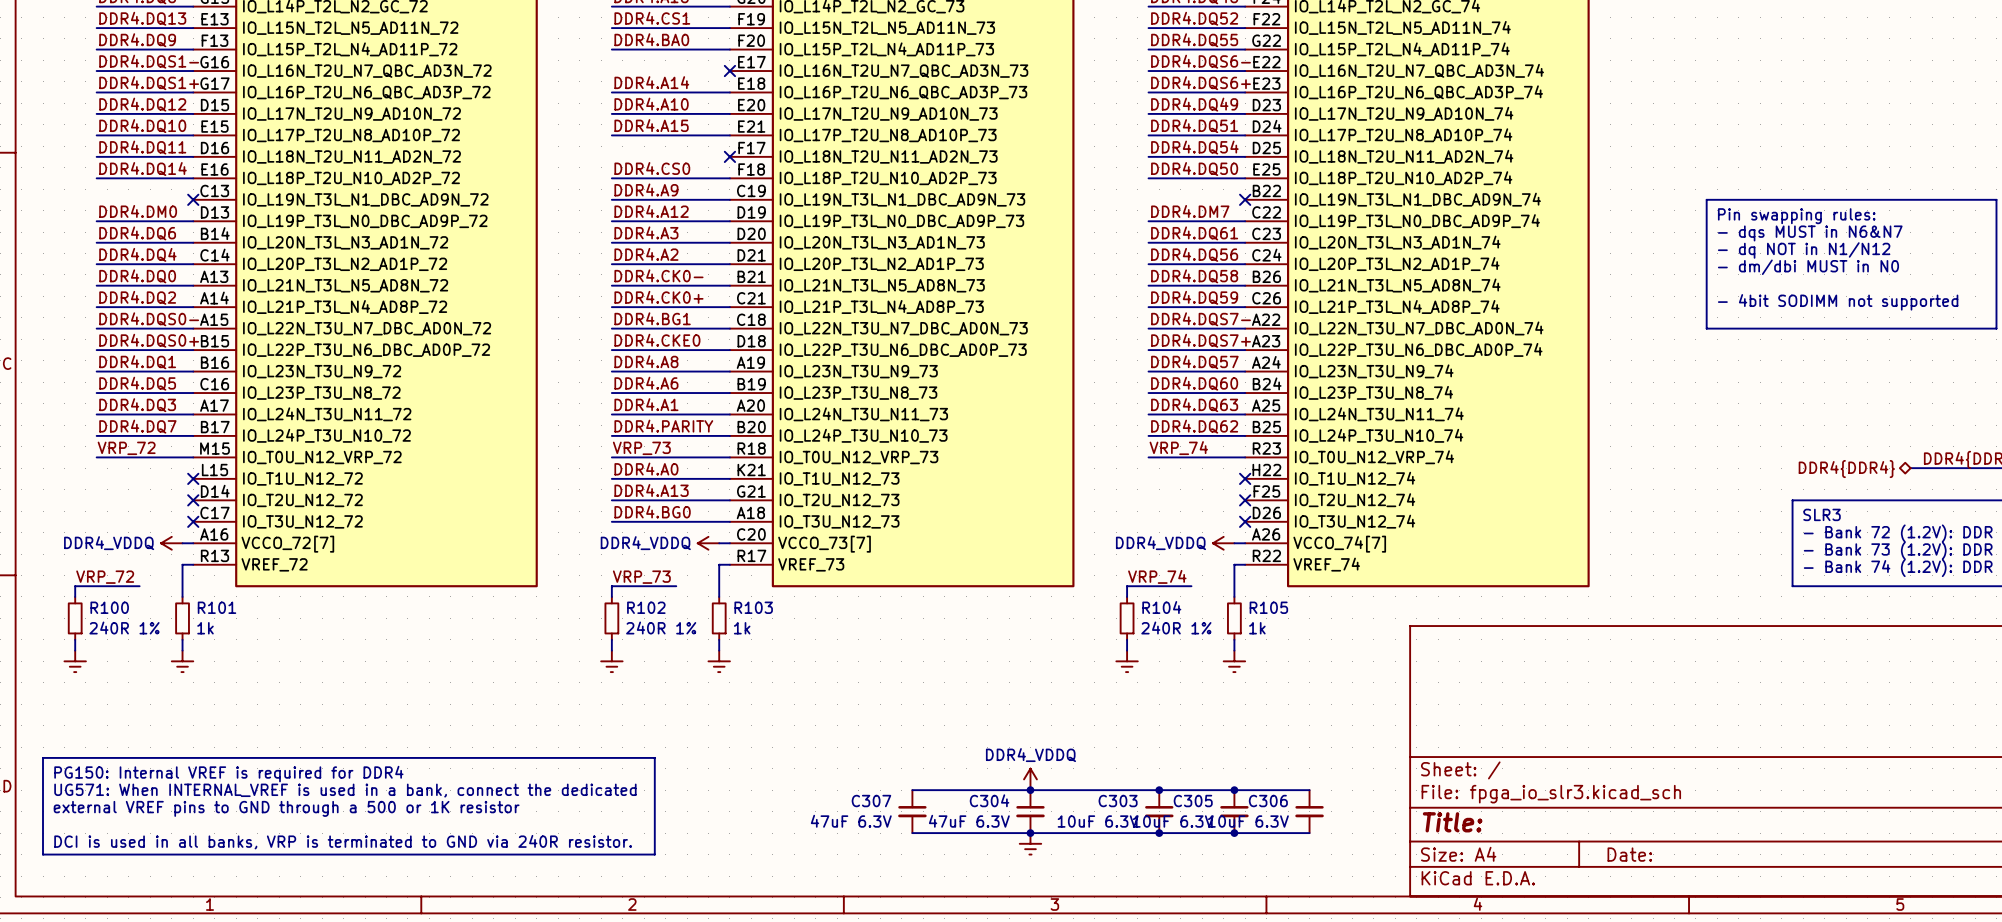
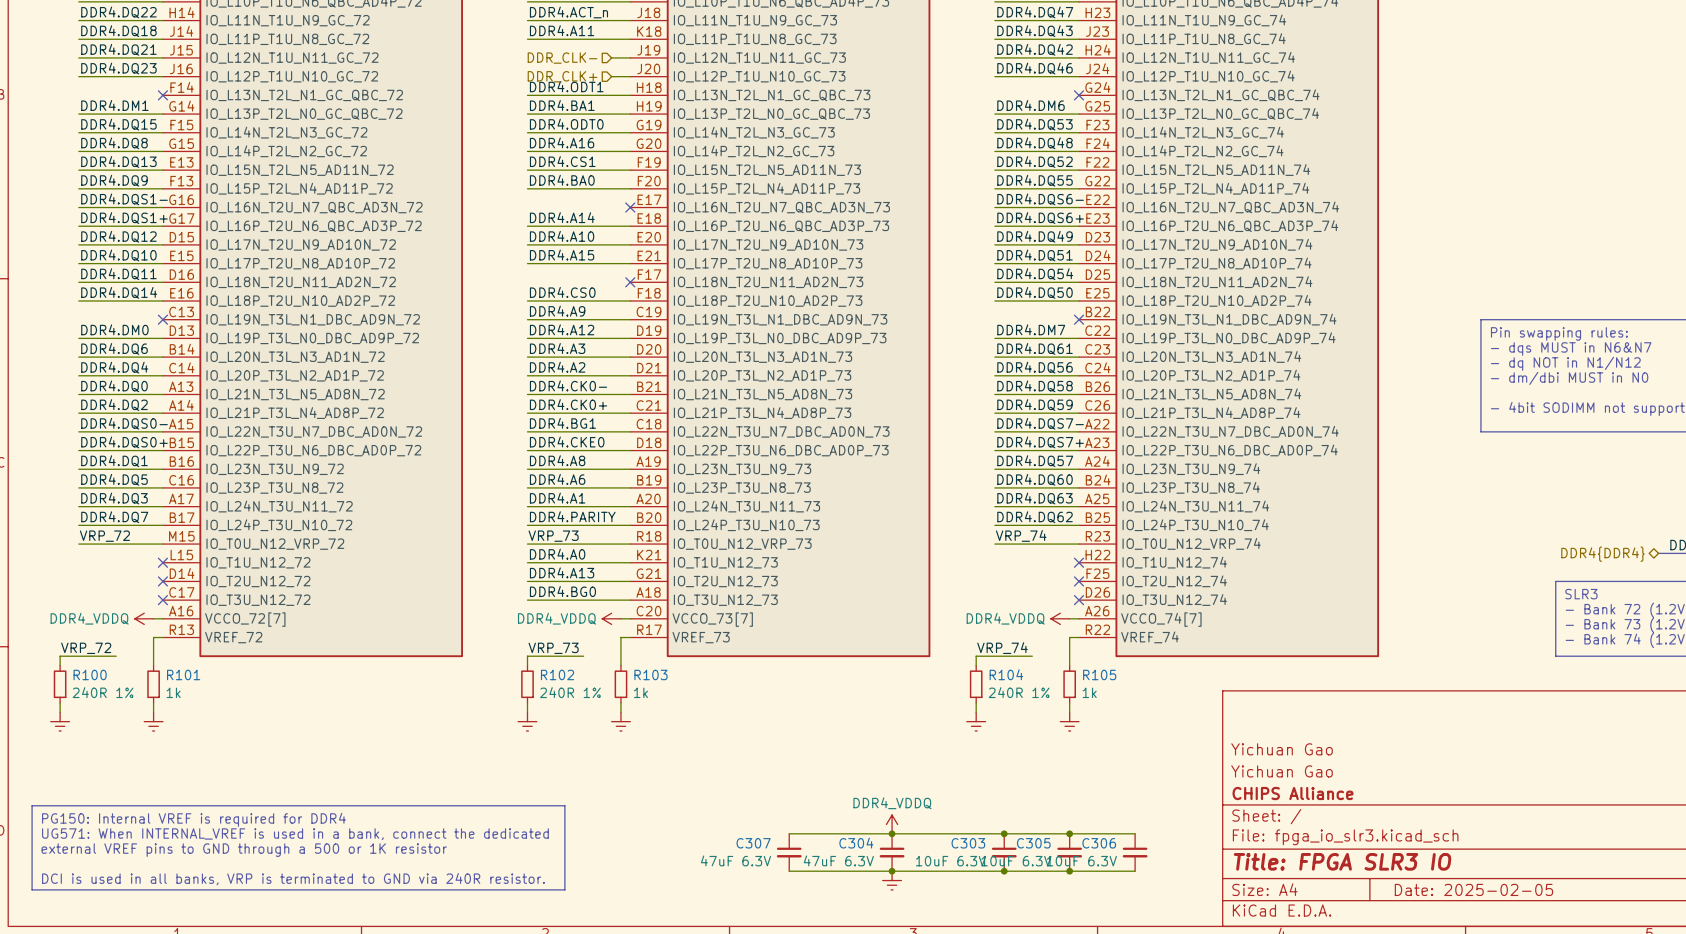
title block: none -> Yichuan Gao (1282, 749)
title block: none -> Yichuan Gao (1282, 771)
title block: none -> CHIPS Alliance (1293, 793)
title block: Title: (1452, 822) -> Title: FPGA SLR3 IO (1342, 861)
title block: Date: (1629, 854) -> Date: 2025-02-05 (1473, 889)

